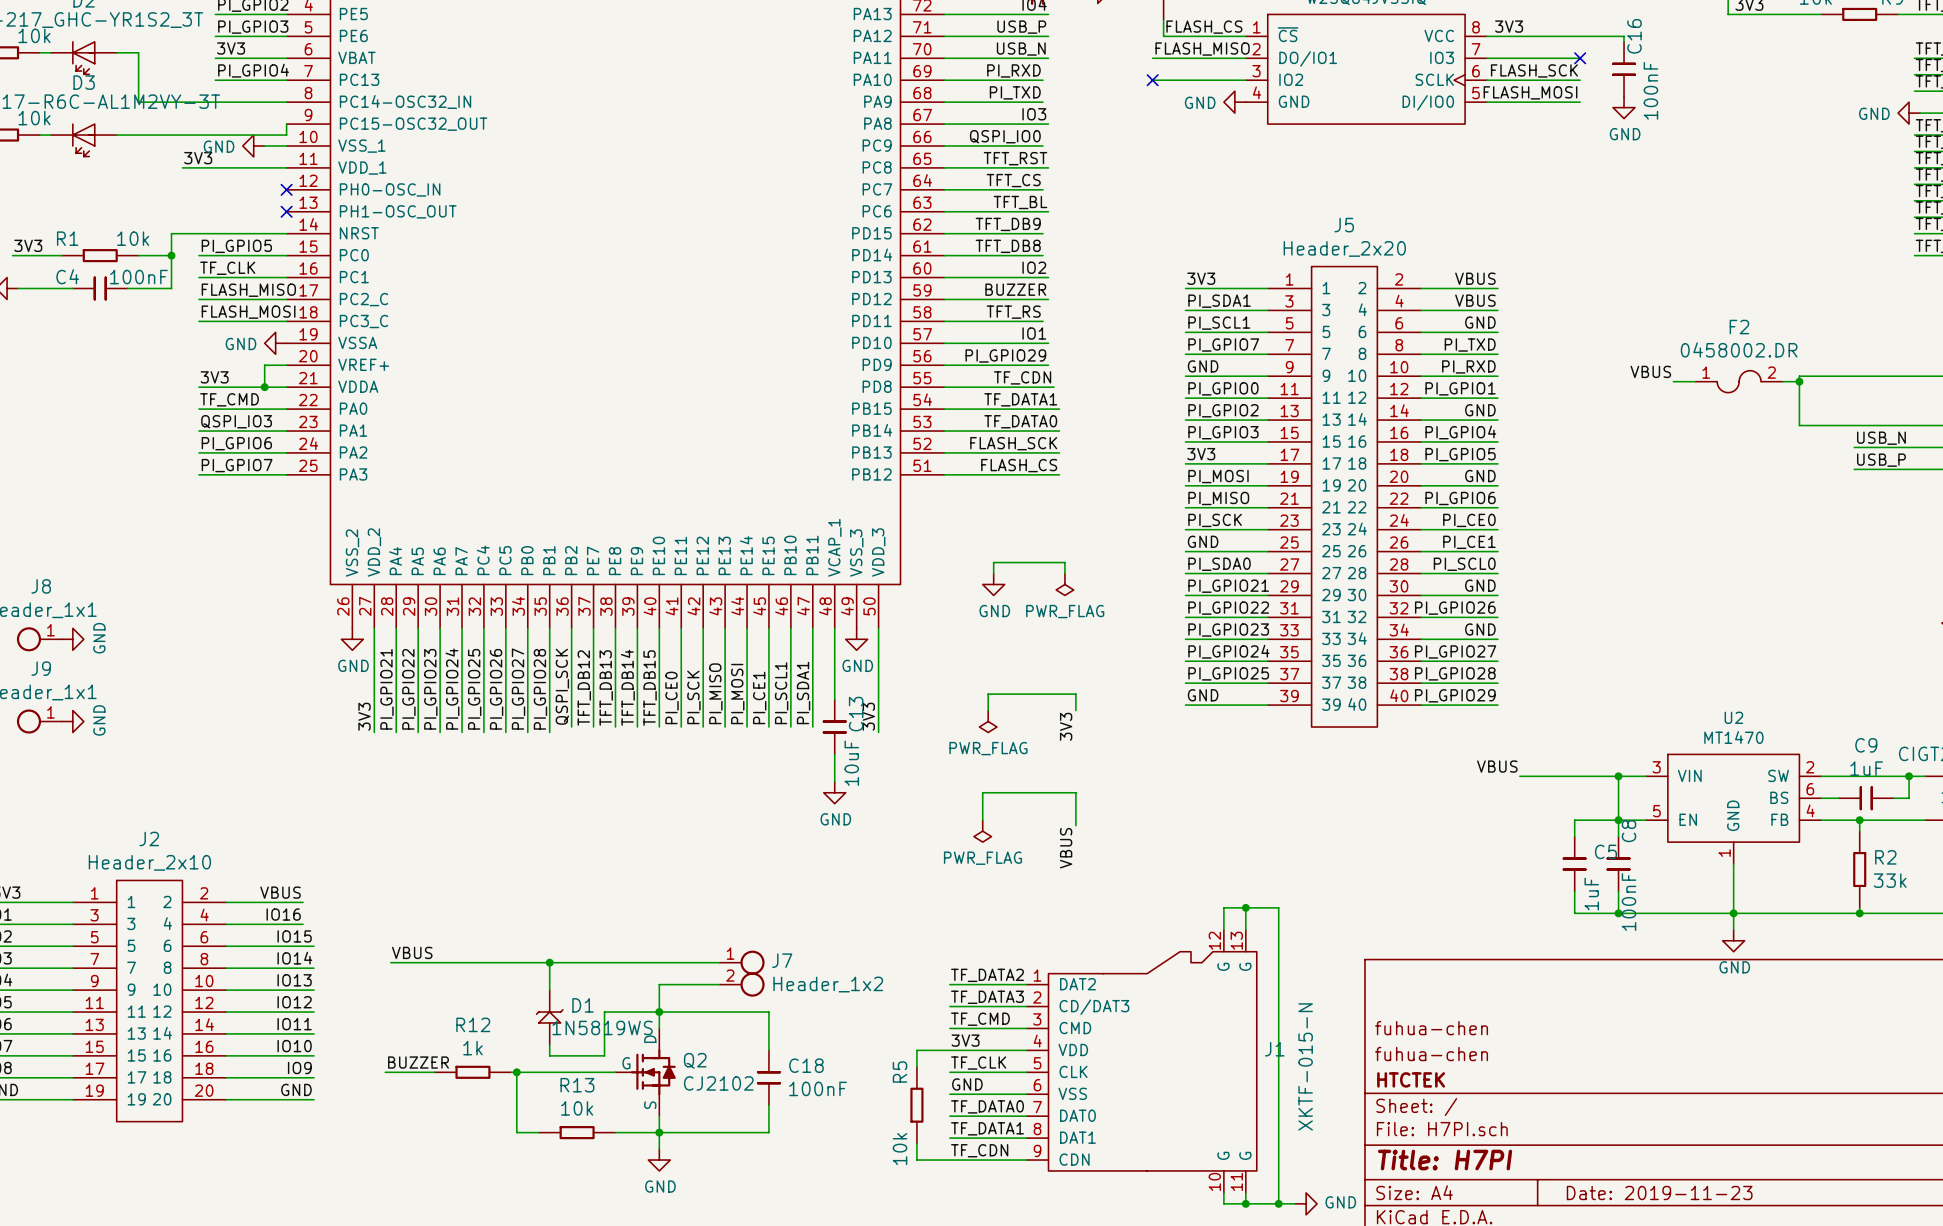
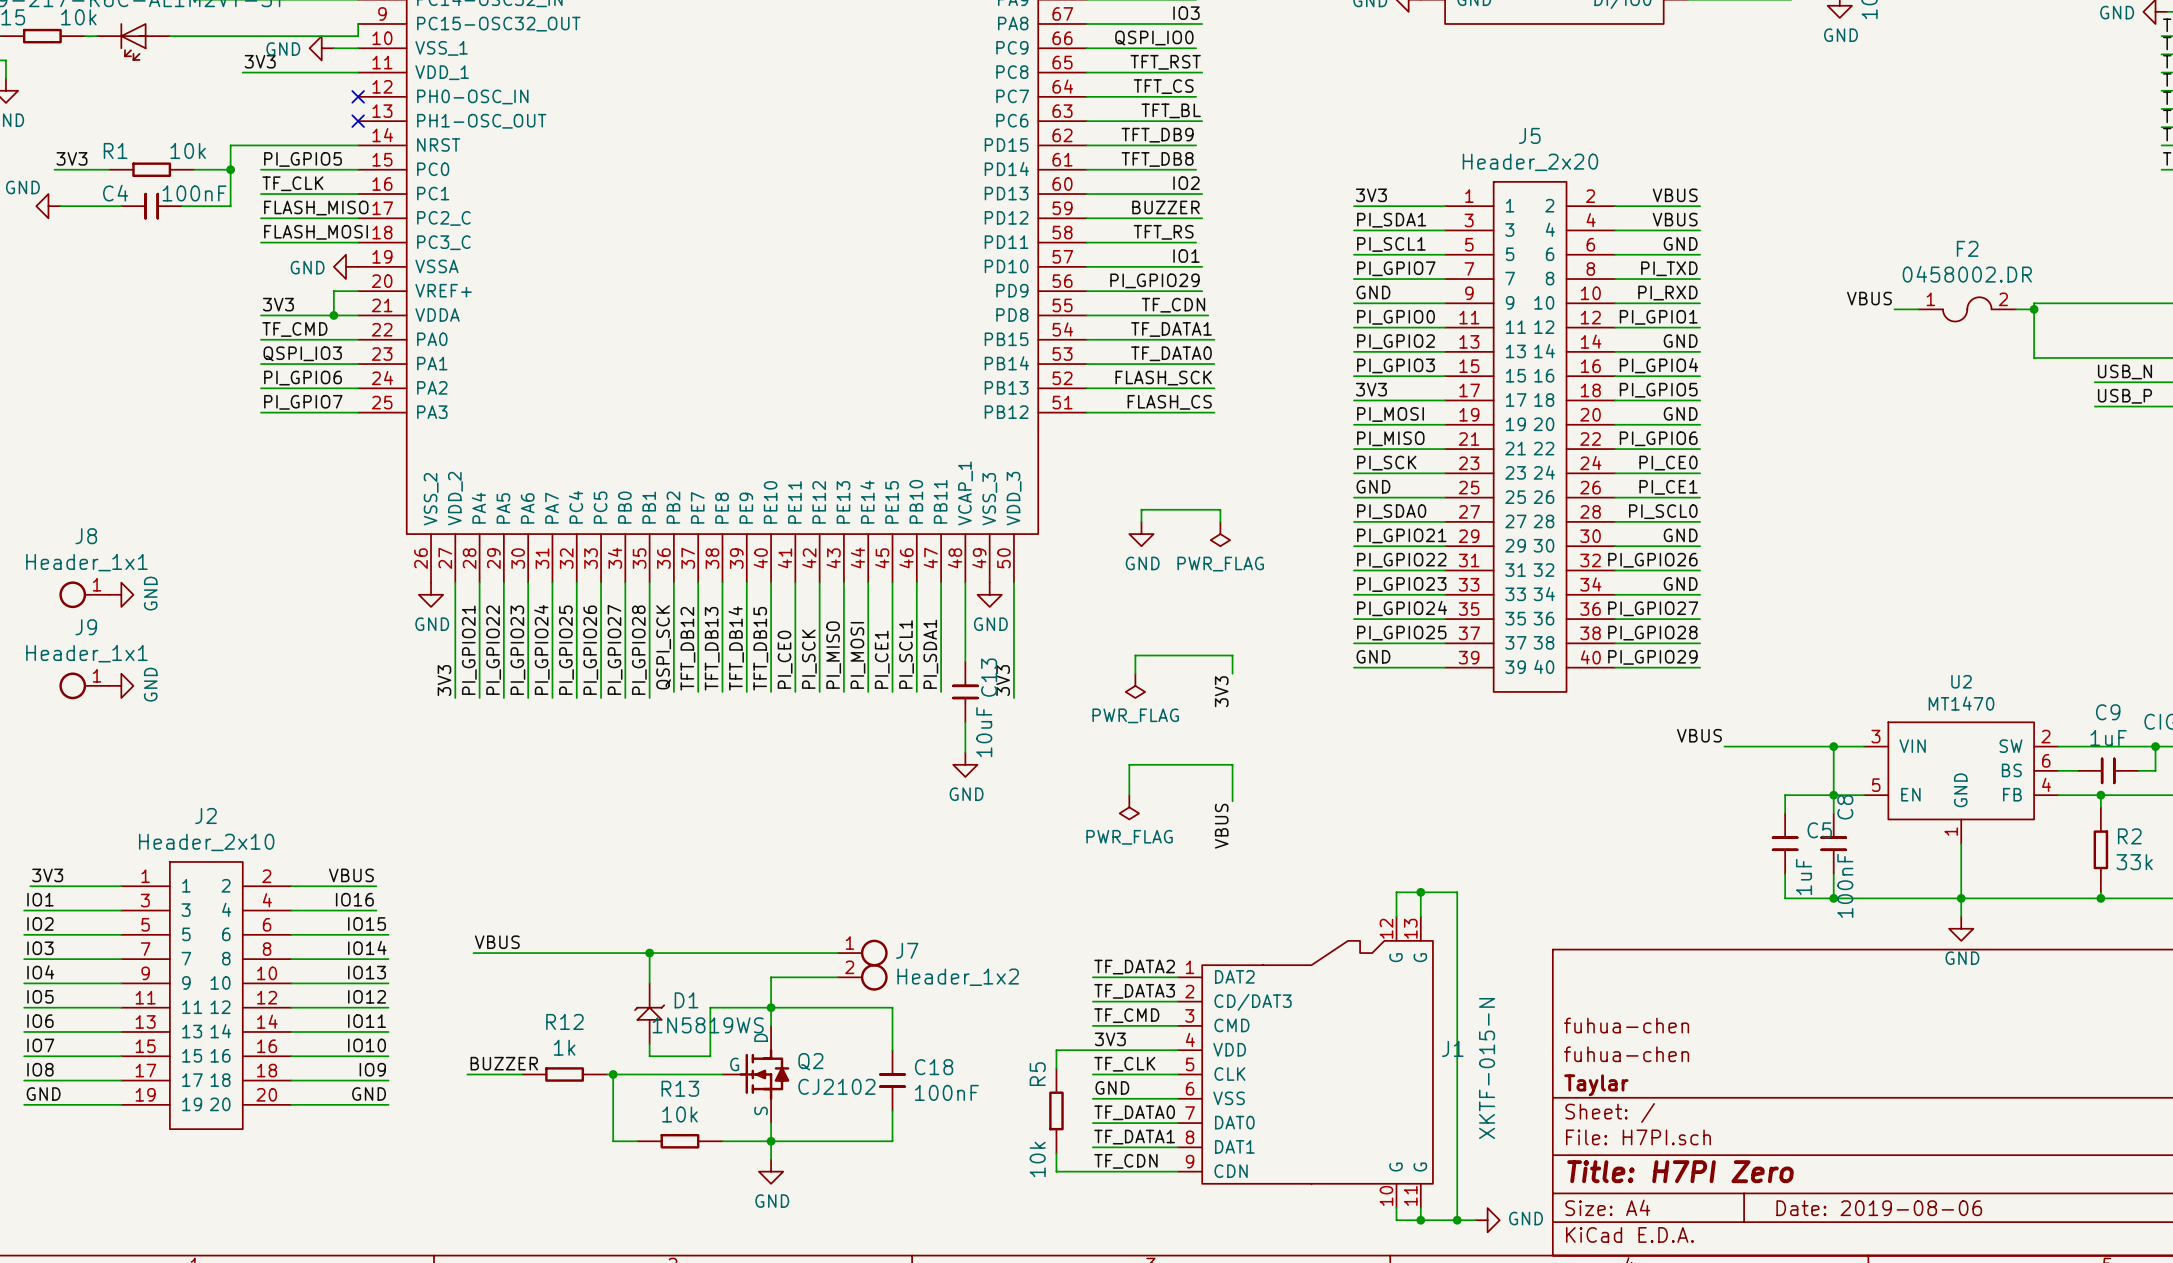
title block: HTCTEK (1411, 1079) -> Taylar (1596, 1085)
title block: Title: H7PI (1445, 1160) -> Title: H7PI Zero (1680, 1171)
title block: Date: 2019-11-23 (1659, 1192) -> Date: 2019-08-06 (1879, 1208)

